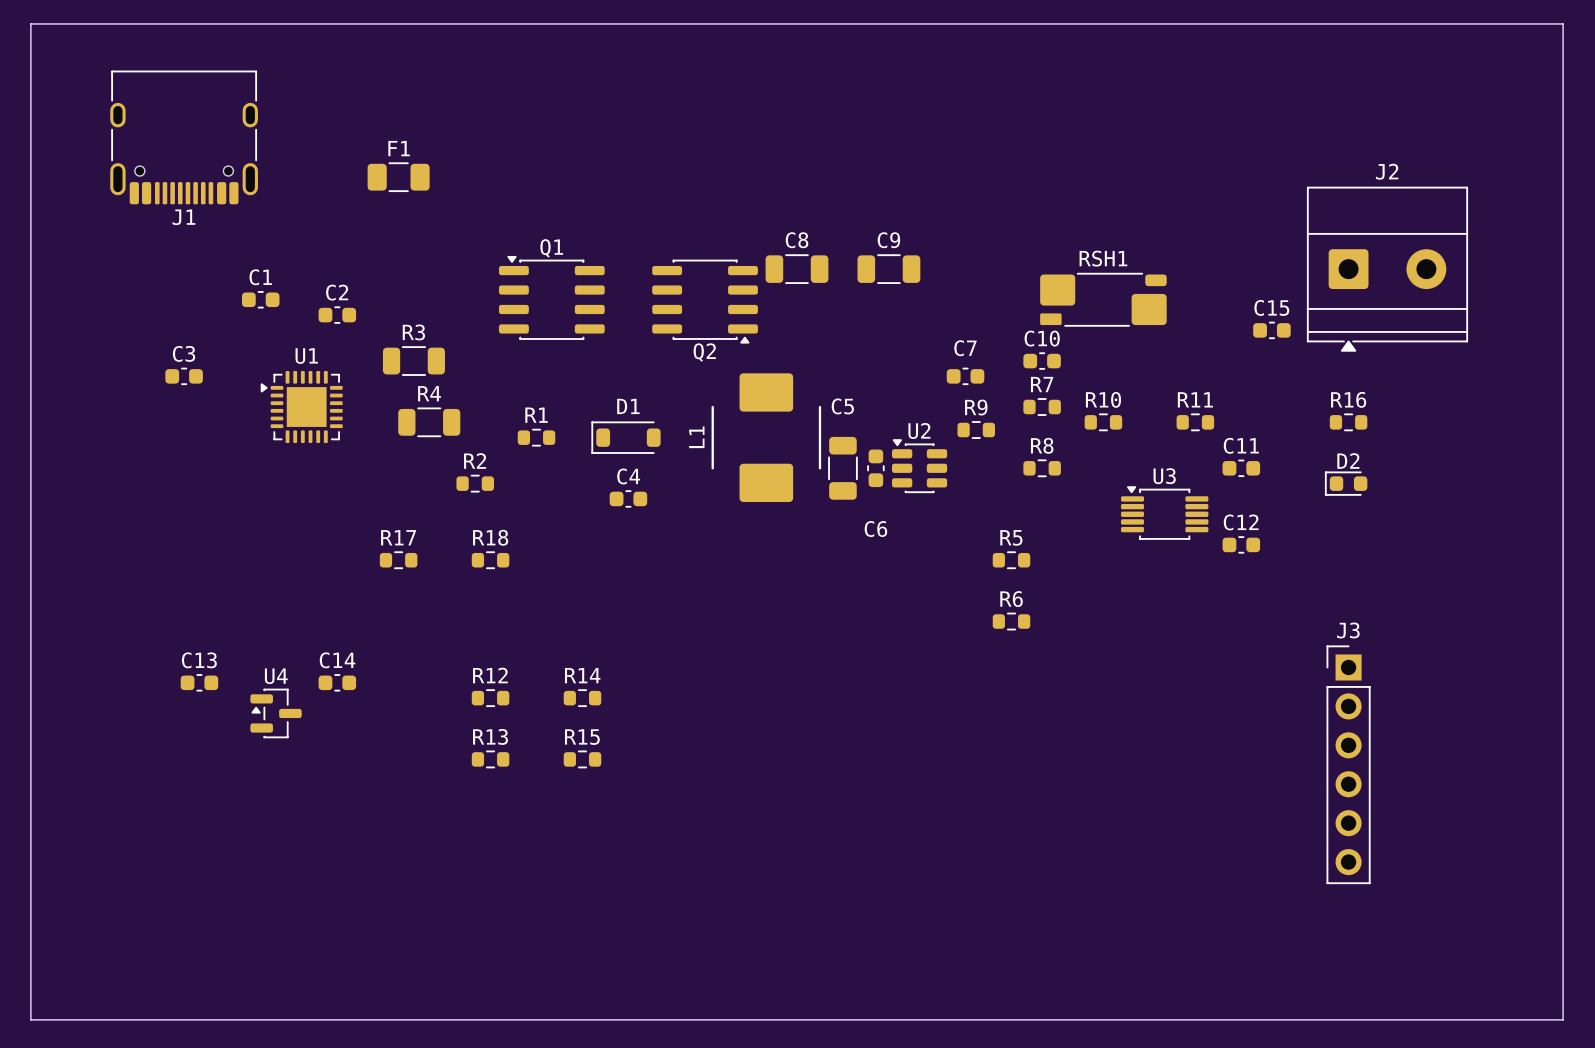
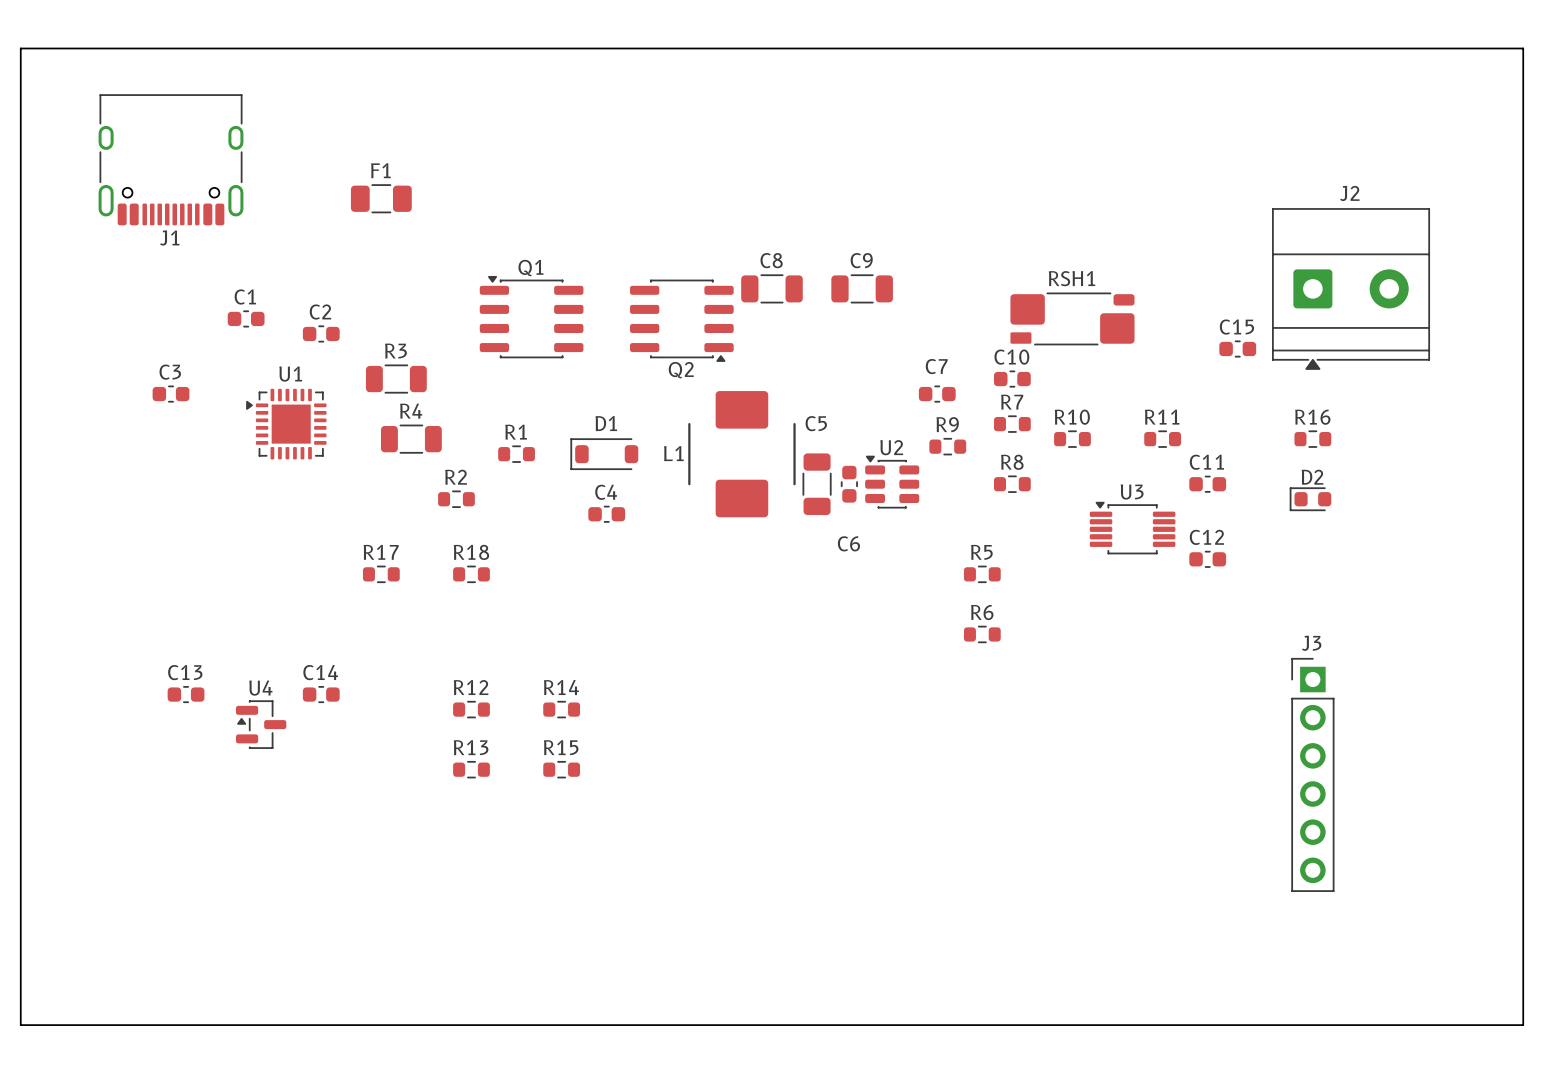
L1 name rotation: 0° (696, 437) -> 90° clockwise (673, 453)

